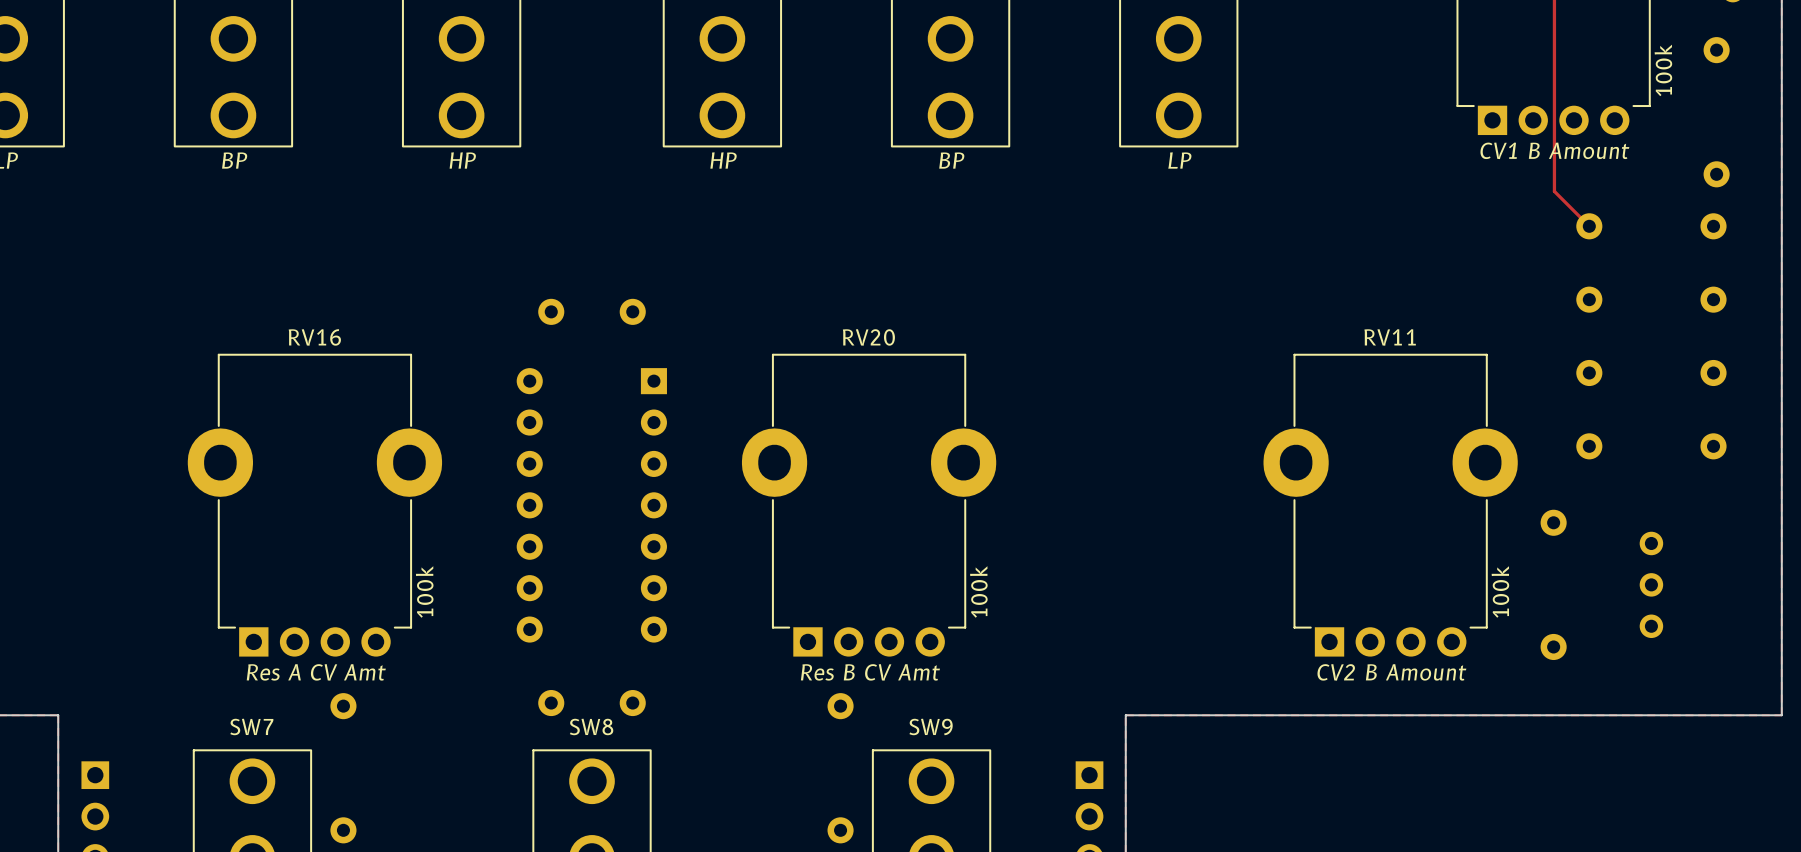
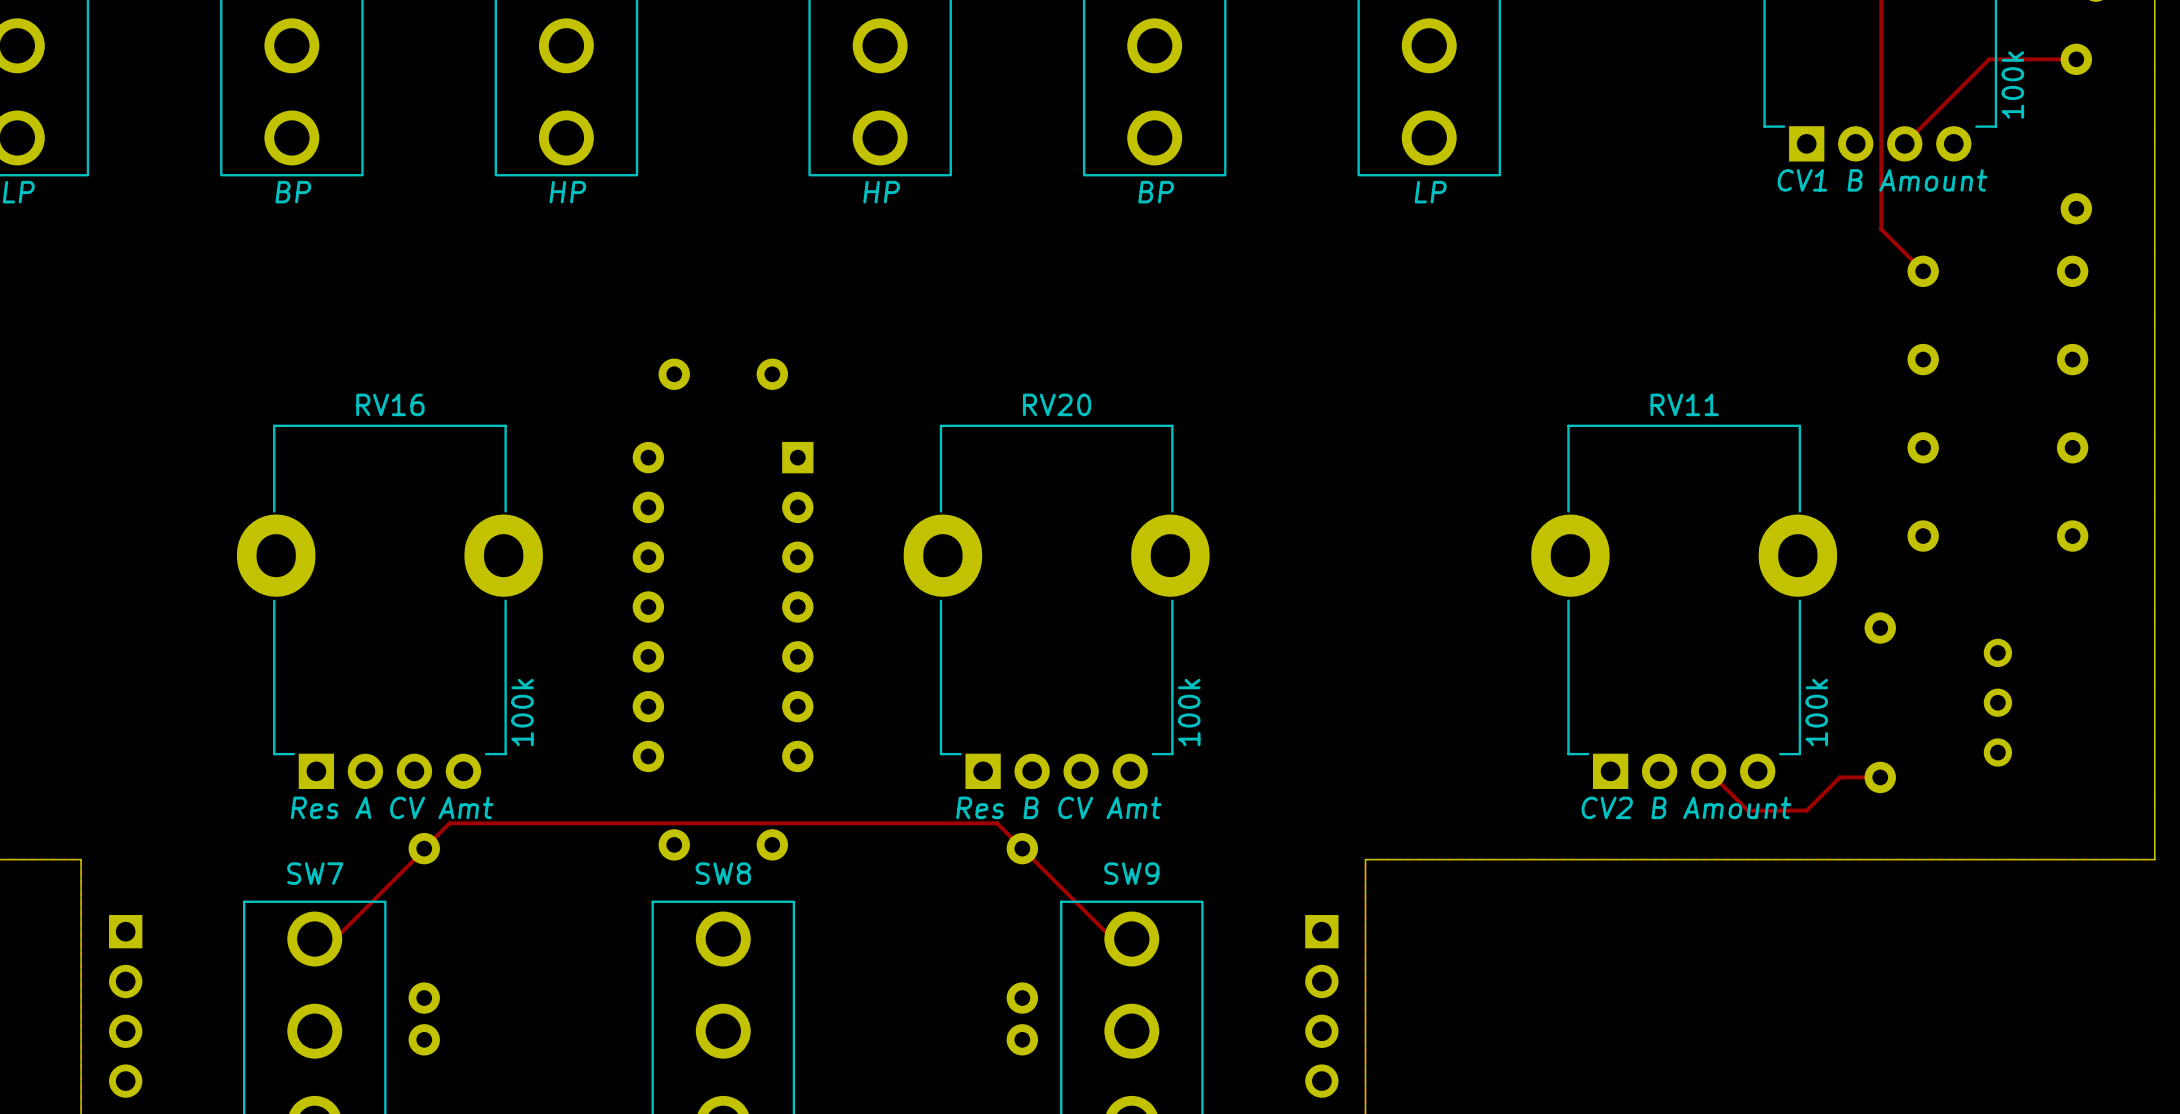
track: none -> (2076, 59) (1989, 59) (1904, 143)
track: none -> (1708, 771) (1747, 810) (1806, 810) (1839, 777) (1880, 777)
track: none -> (314, 939) (335, 939) (449, 823) (997, 823) (1112, 939) (1131, 939)

